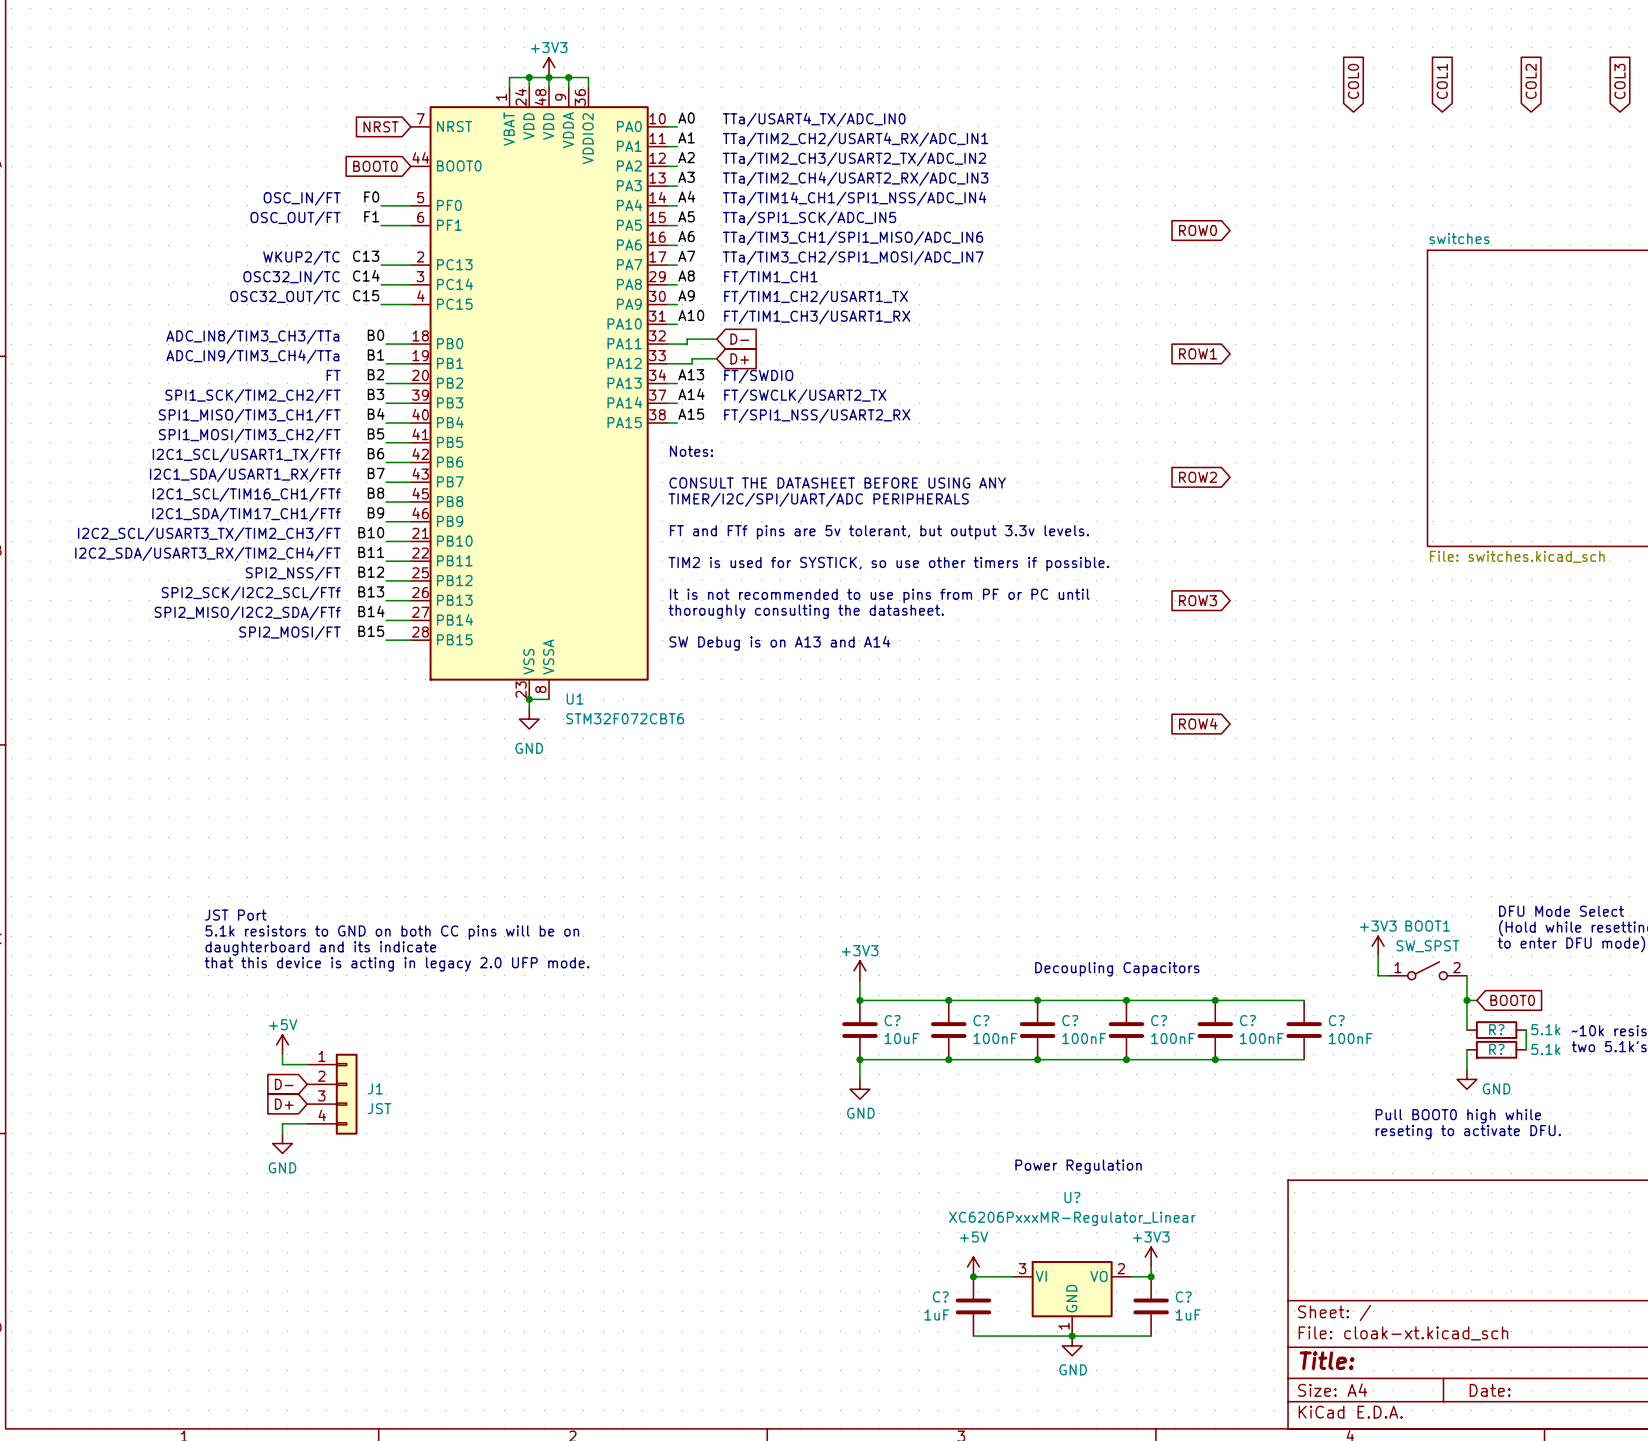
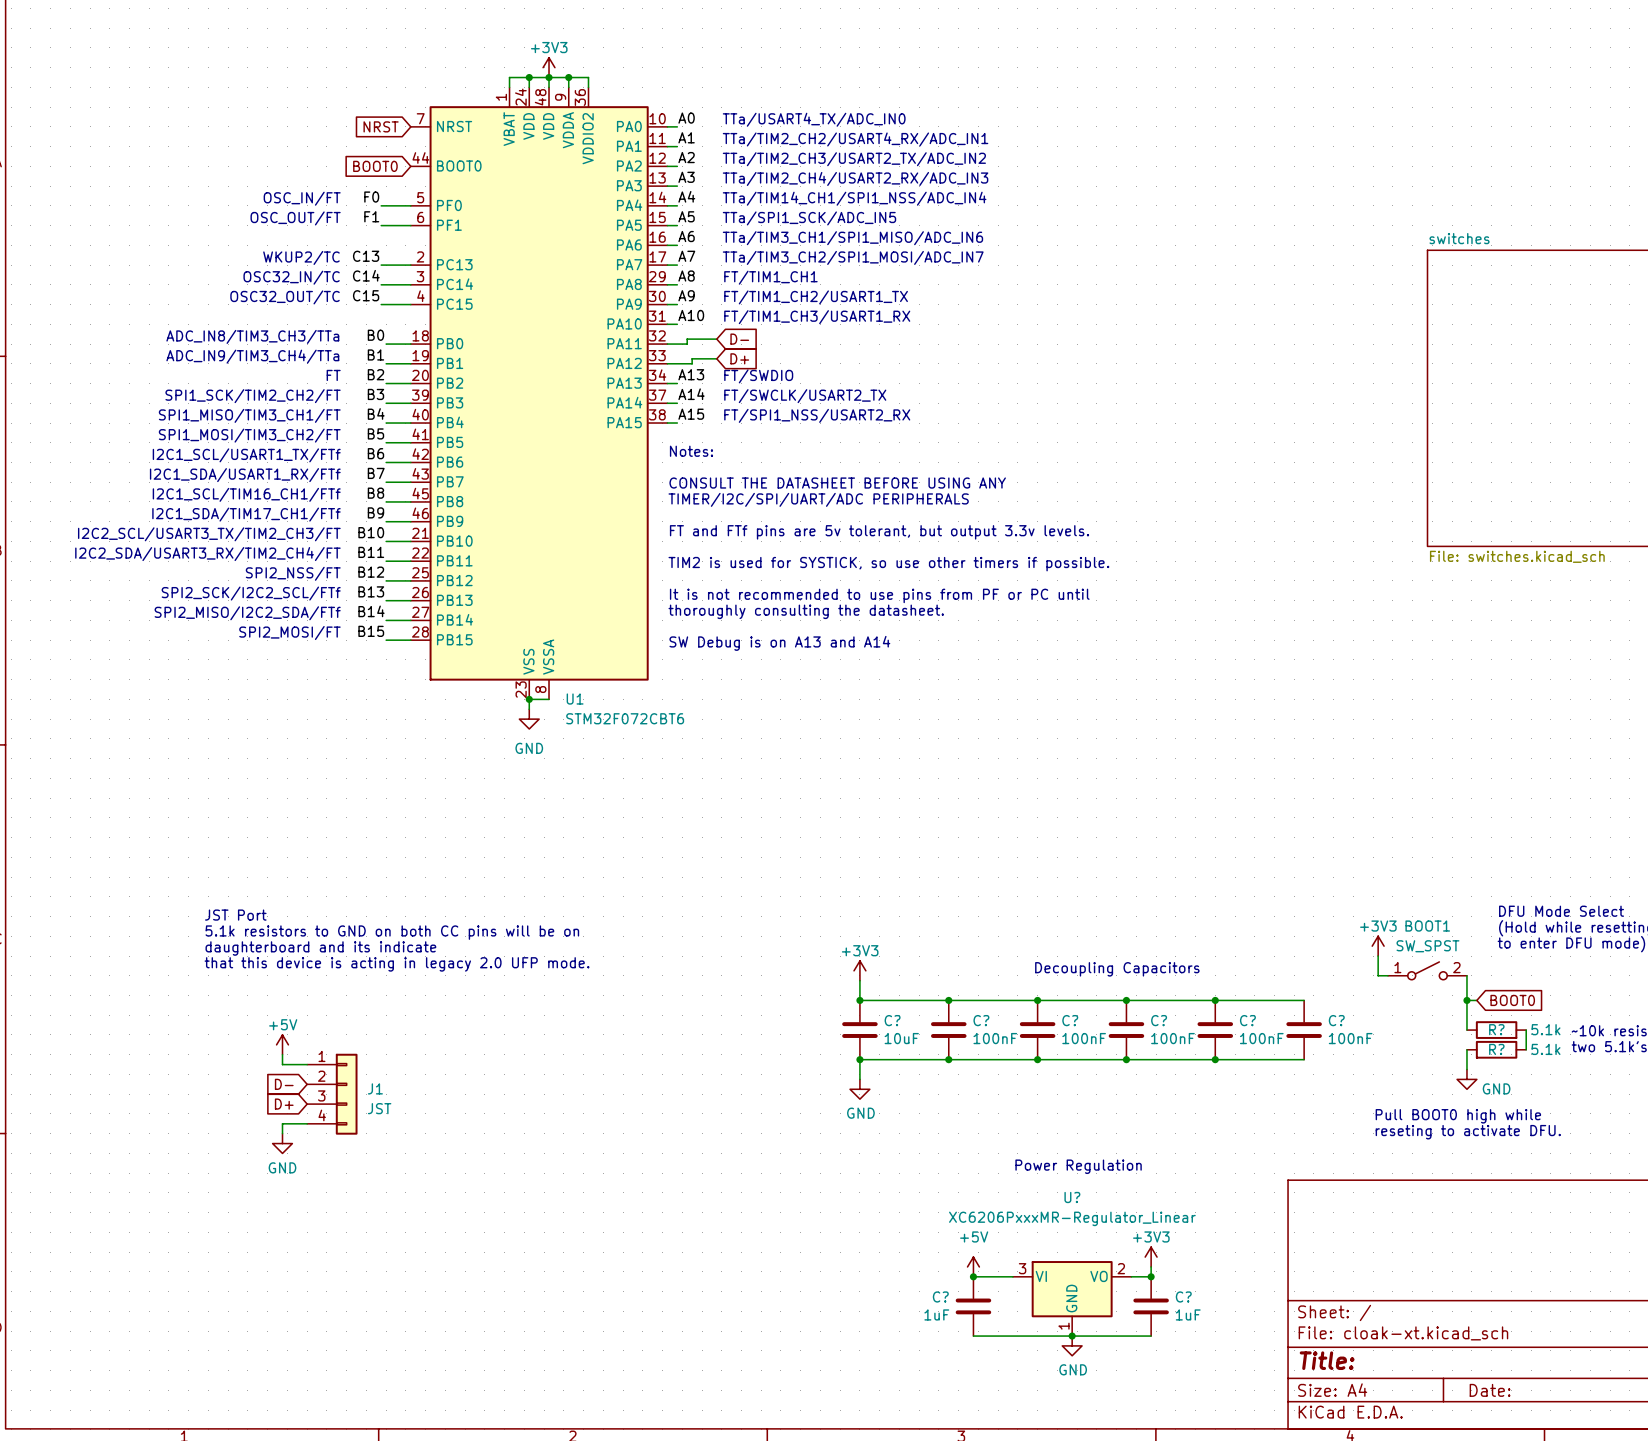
global label: COL0 (1353, 81) -> none
global label: COL1 (1442, 81) -> none
global label: COL2 (1531, 81) -> none
global label: COL3 (1619, 81) -> none
global label: ROW0 (1197, 230) -> none
global label: ROW1 (1197, 353) -> none
global label: ROW2 (1197, 477) -> none
global label: ROW3 (1197, 600) -> none
global label: ROW4 (1198, 723) -> none

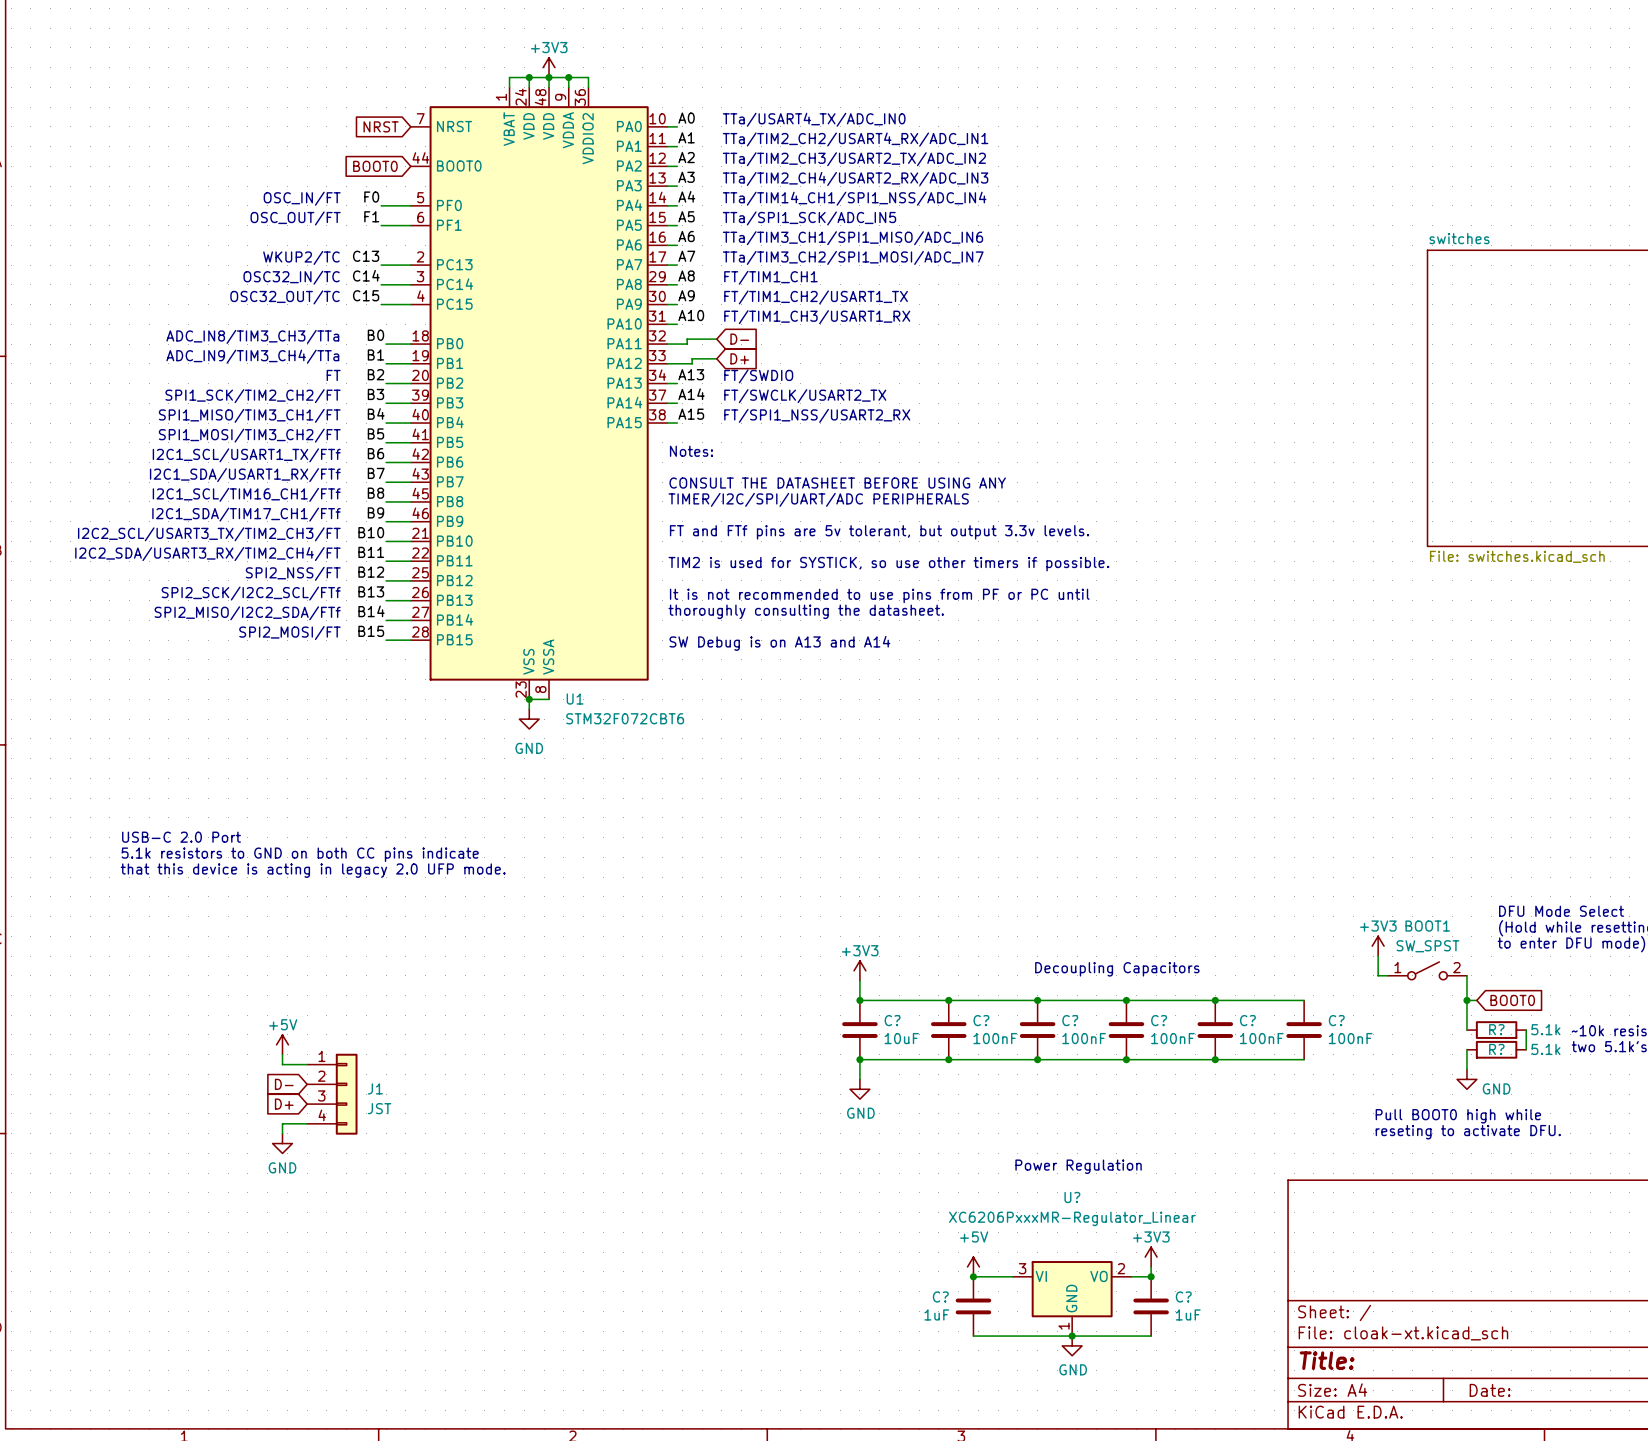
text: none -> USB-C 2.0 Port (181, 837)
text: none -> 5.1k resistors to GND on both CC pins indicate (300, 854)
text: JST Port (235, 915) -> none
text: 5.1k resistors to GND on both CC pins will be on (392, 932) -> none
text: daughterboard and its indicate (320, 948) -> none
text position: that this device is acting in legacy 2.0 UFP mode. (397, 964) -> that this device is acting in legacy 2.0 UFP mode. (313, 870)

